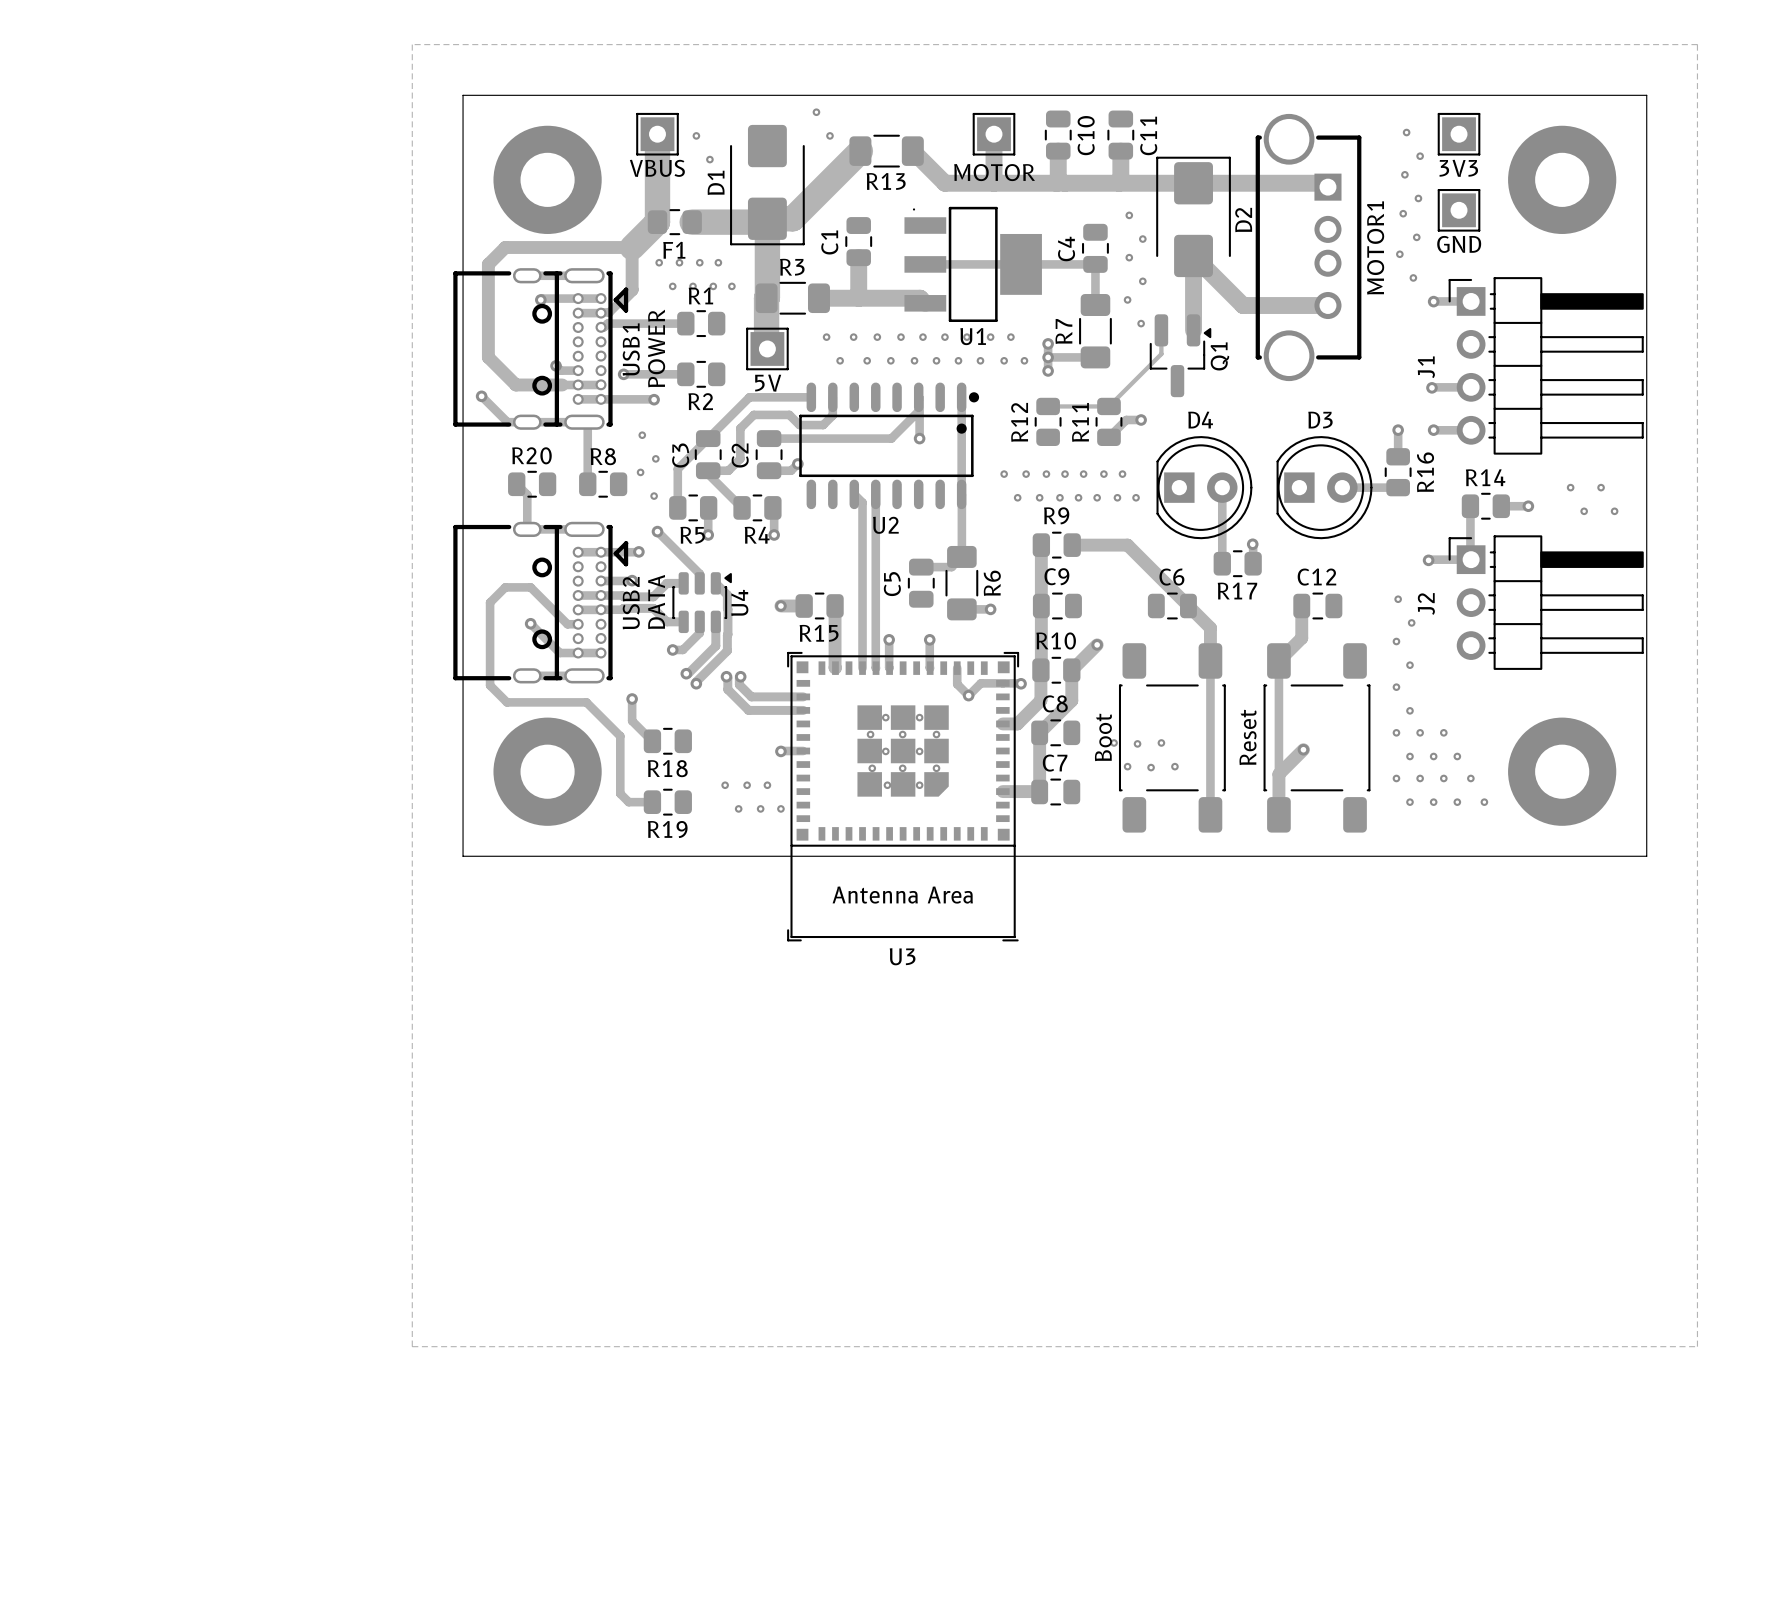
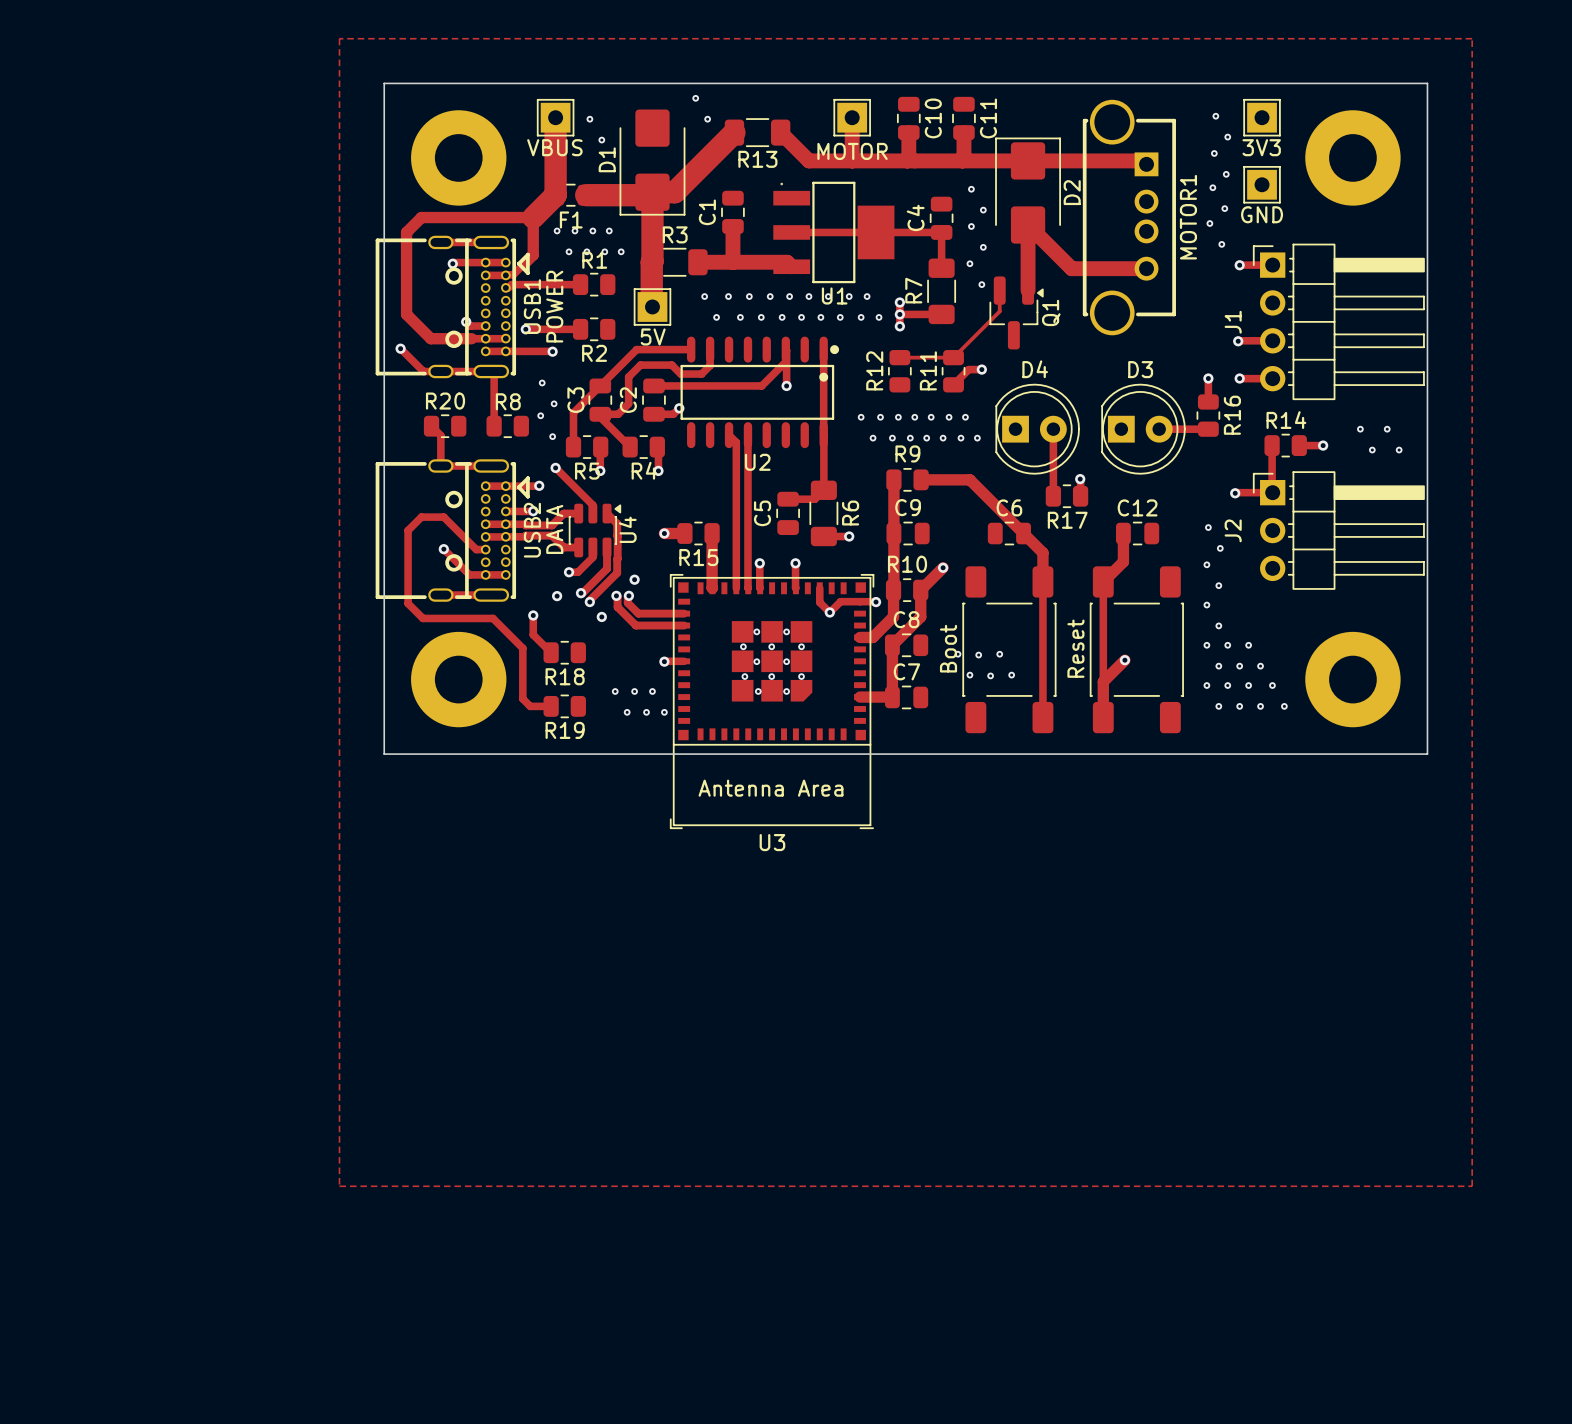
via: none -> (634, 579)
via: none -> (557, 596)
via: none -> (601, 616)

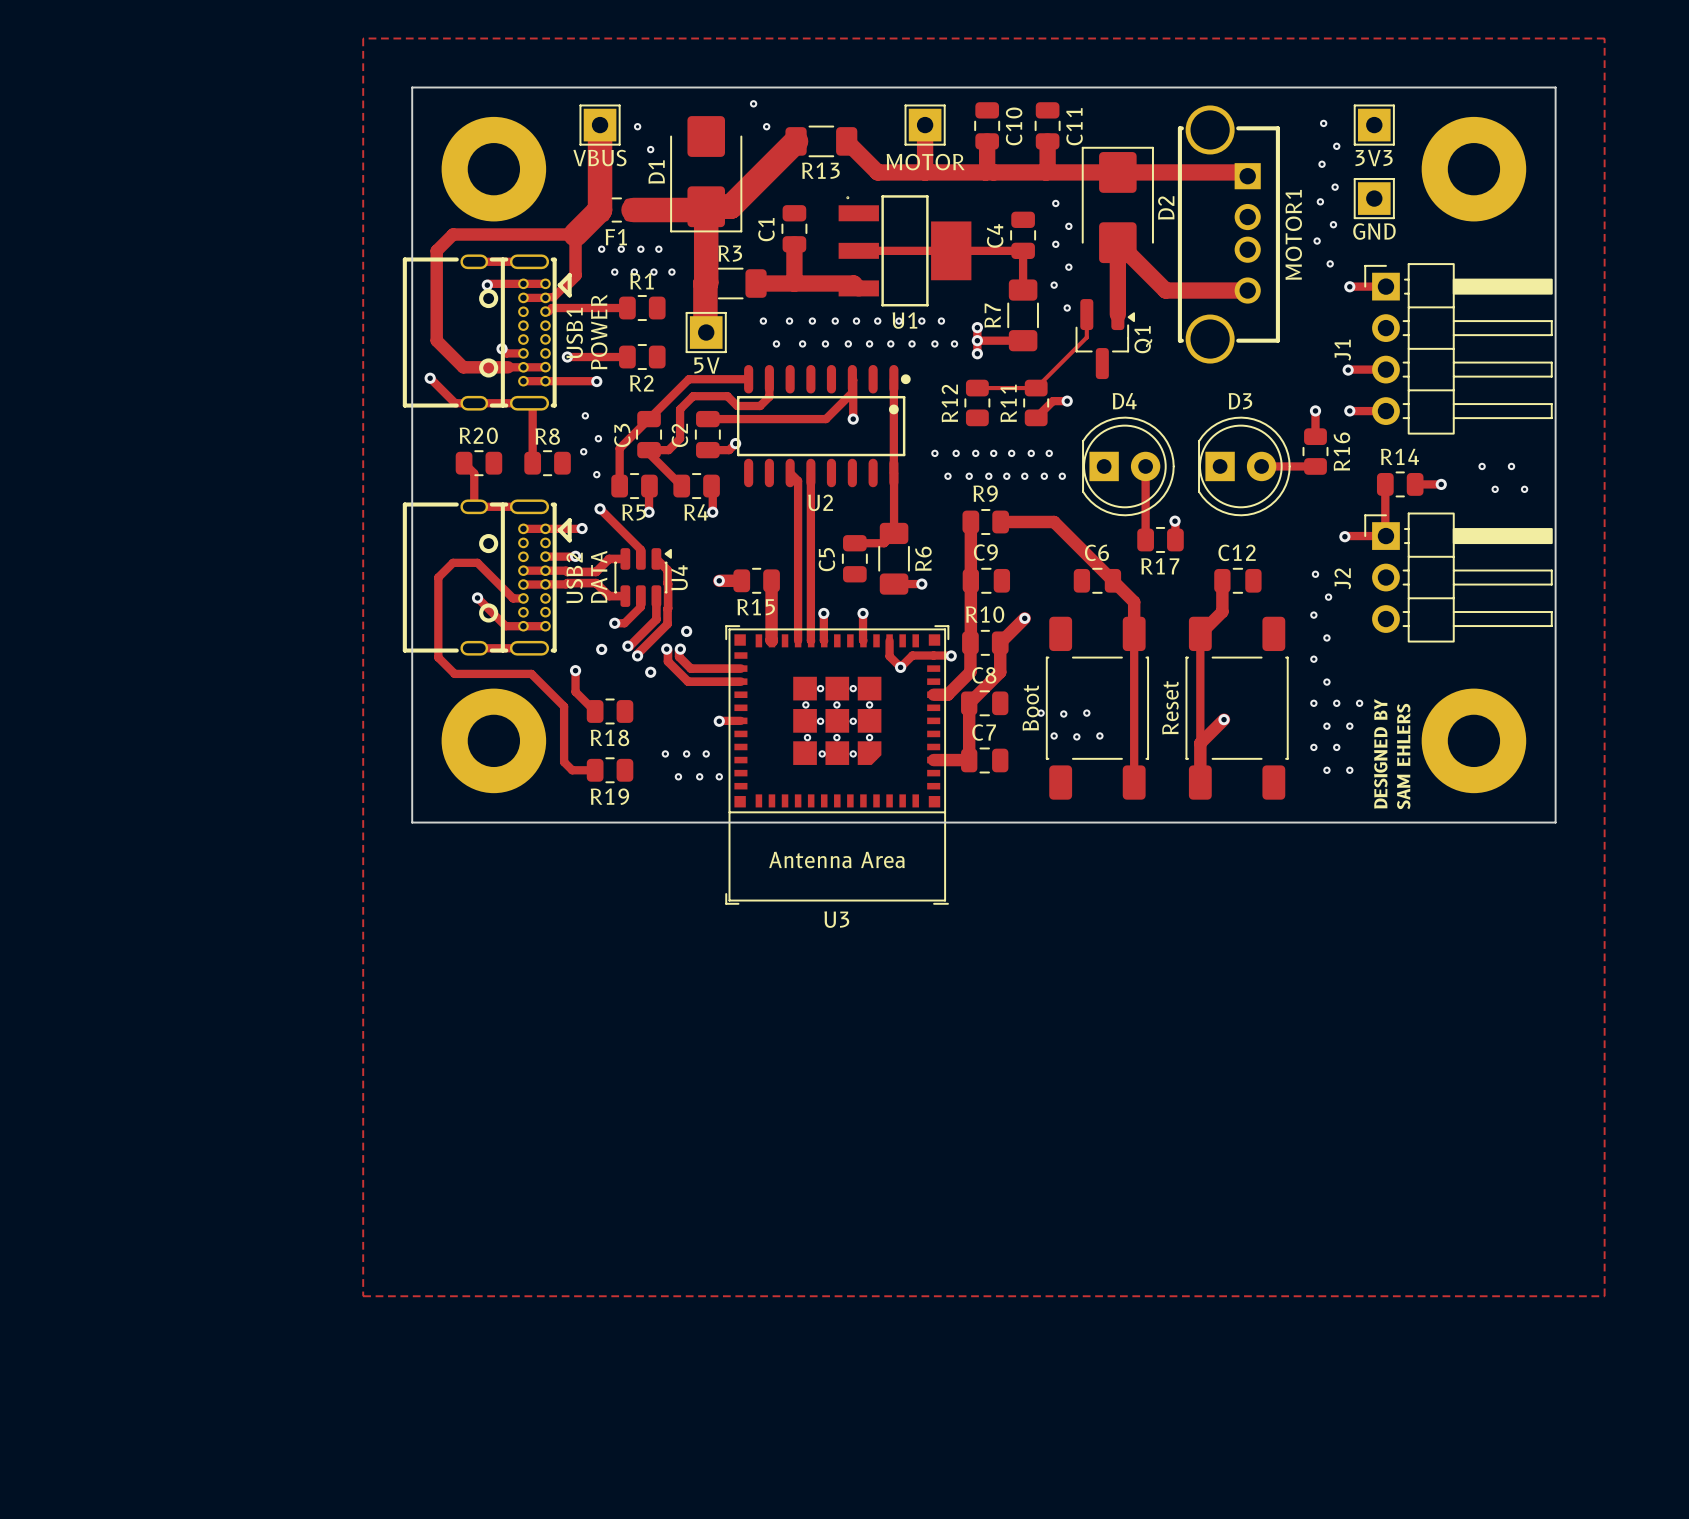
via: (1260, 666) -> none
text: none -> DESIGNED BY (1380, 753)
text: none -> SAM EHLERS (1403, 756)
via: (1248, 685) -> none
via: (1272, 685) -> none
via: (1260, 706) -> none
via: (1284, 706) -> none

